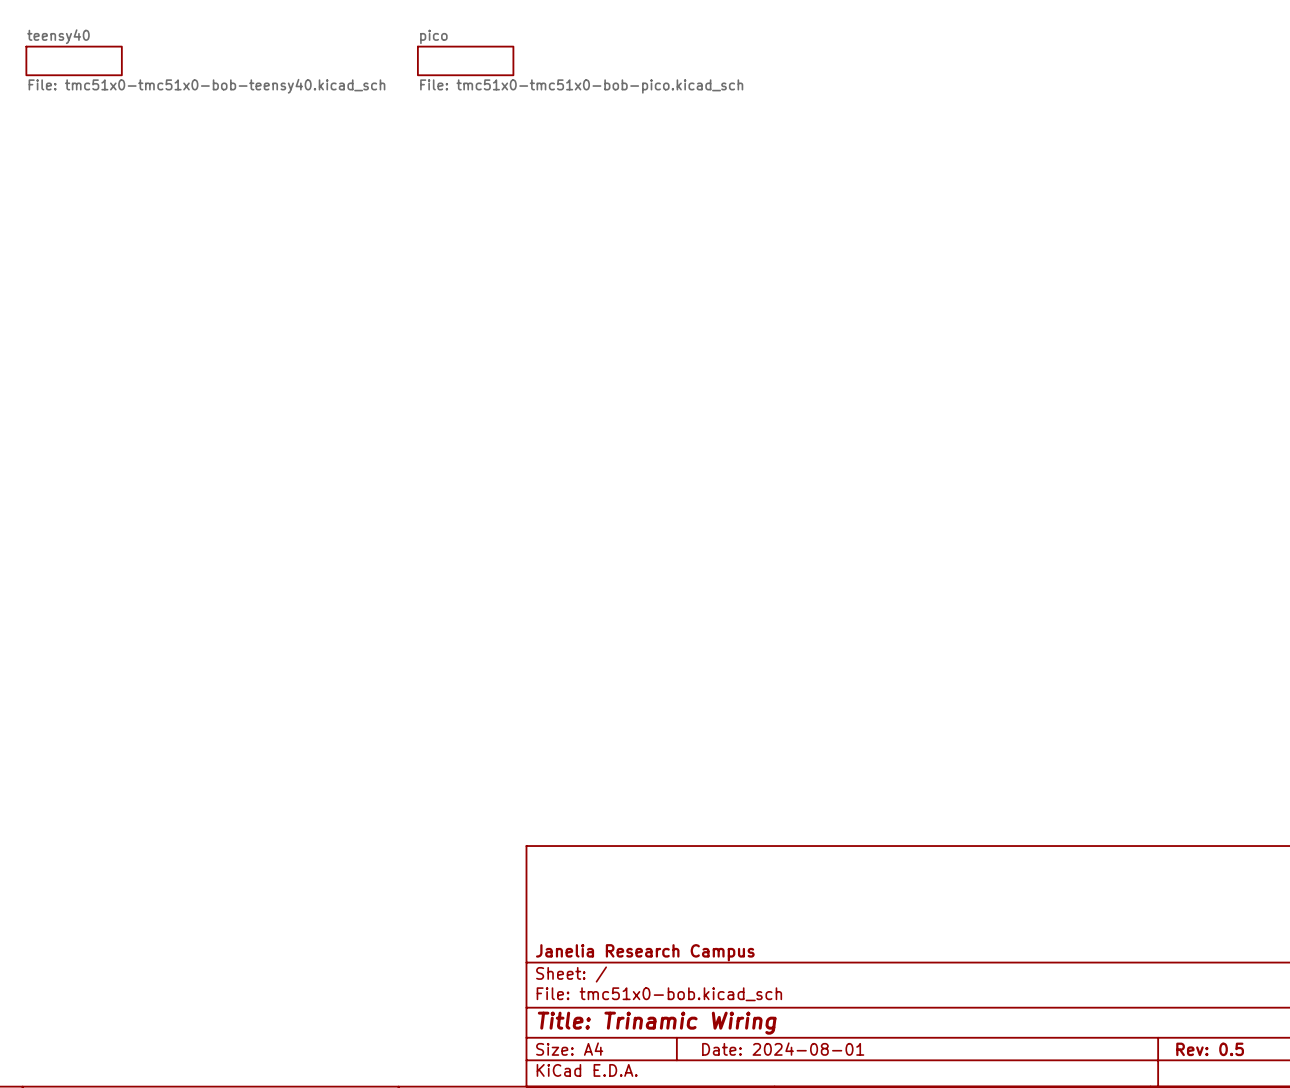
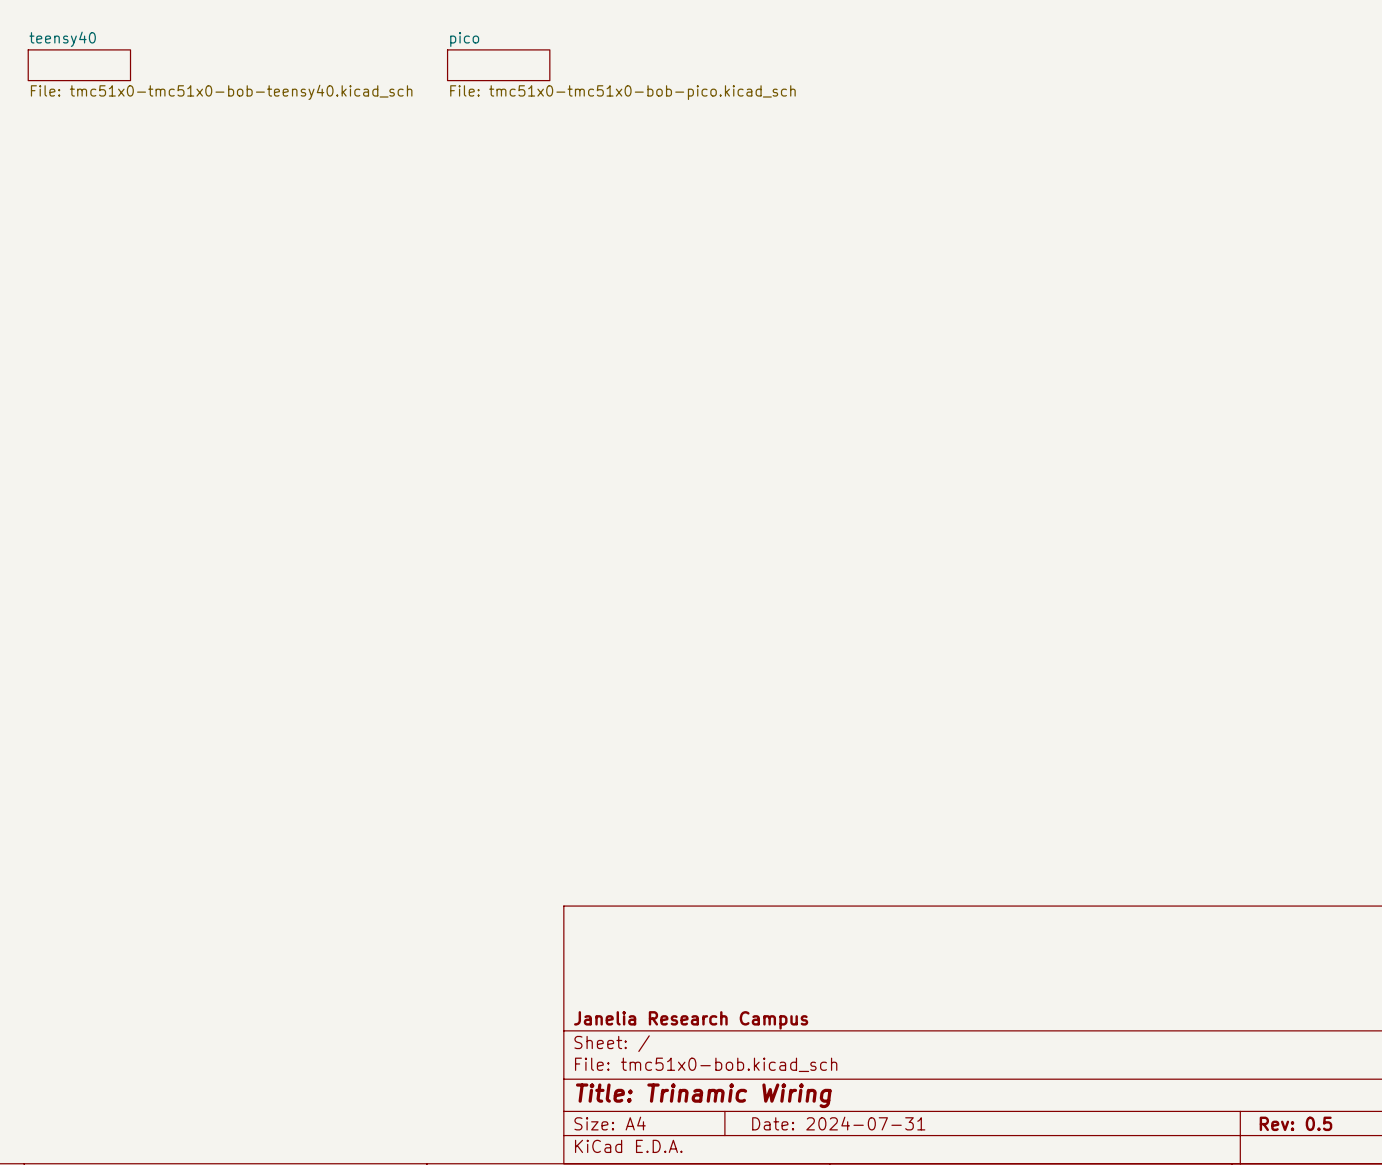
title block: Date: 2024-08-01 (783, 1049) -> Date: 2024-07-31 (838, 1123)

